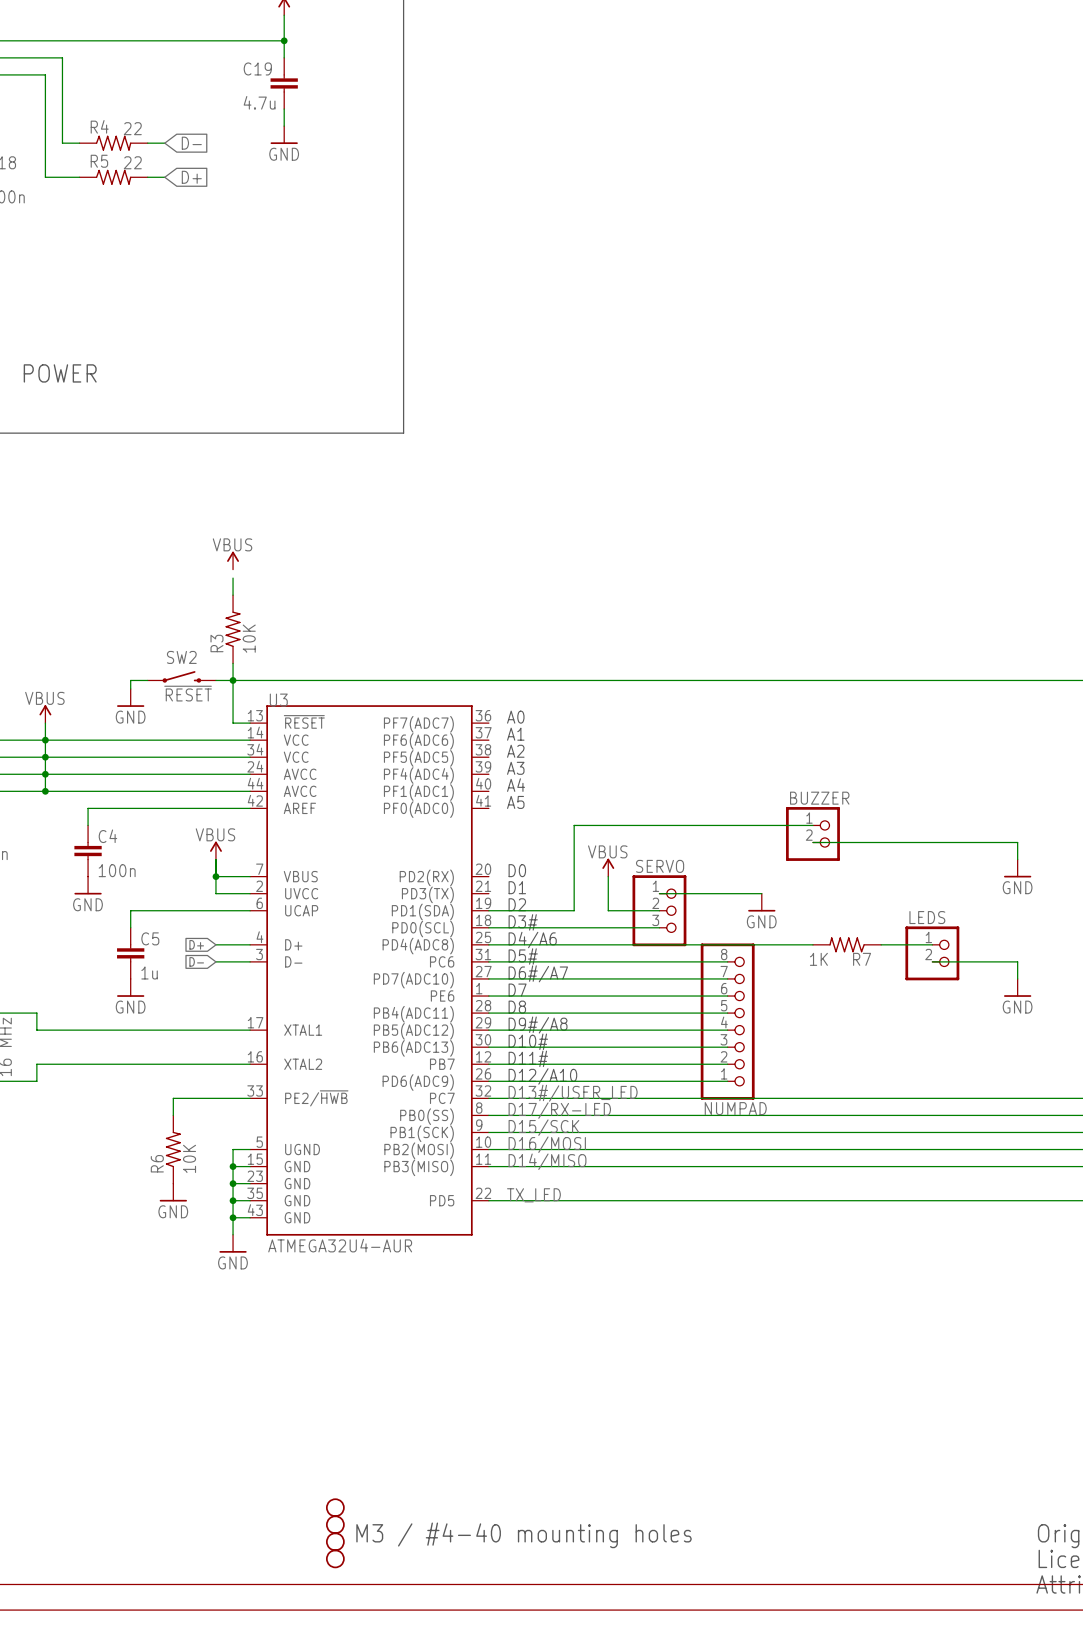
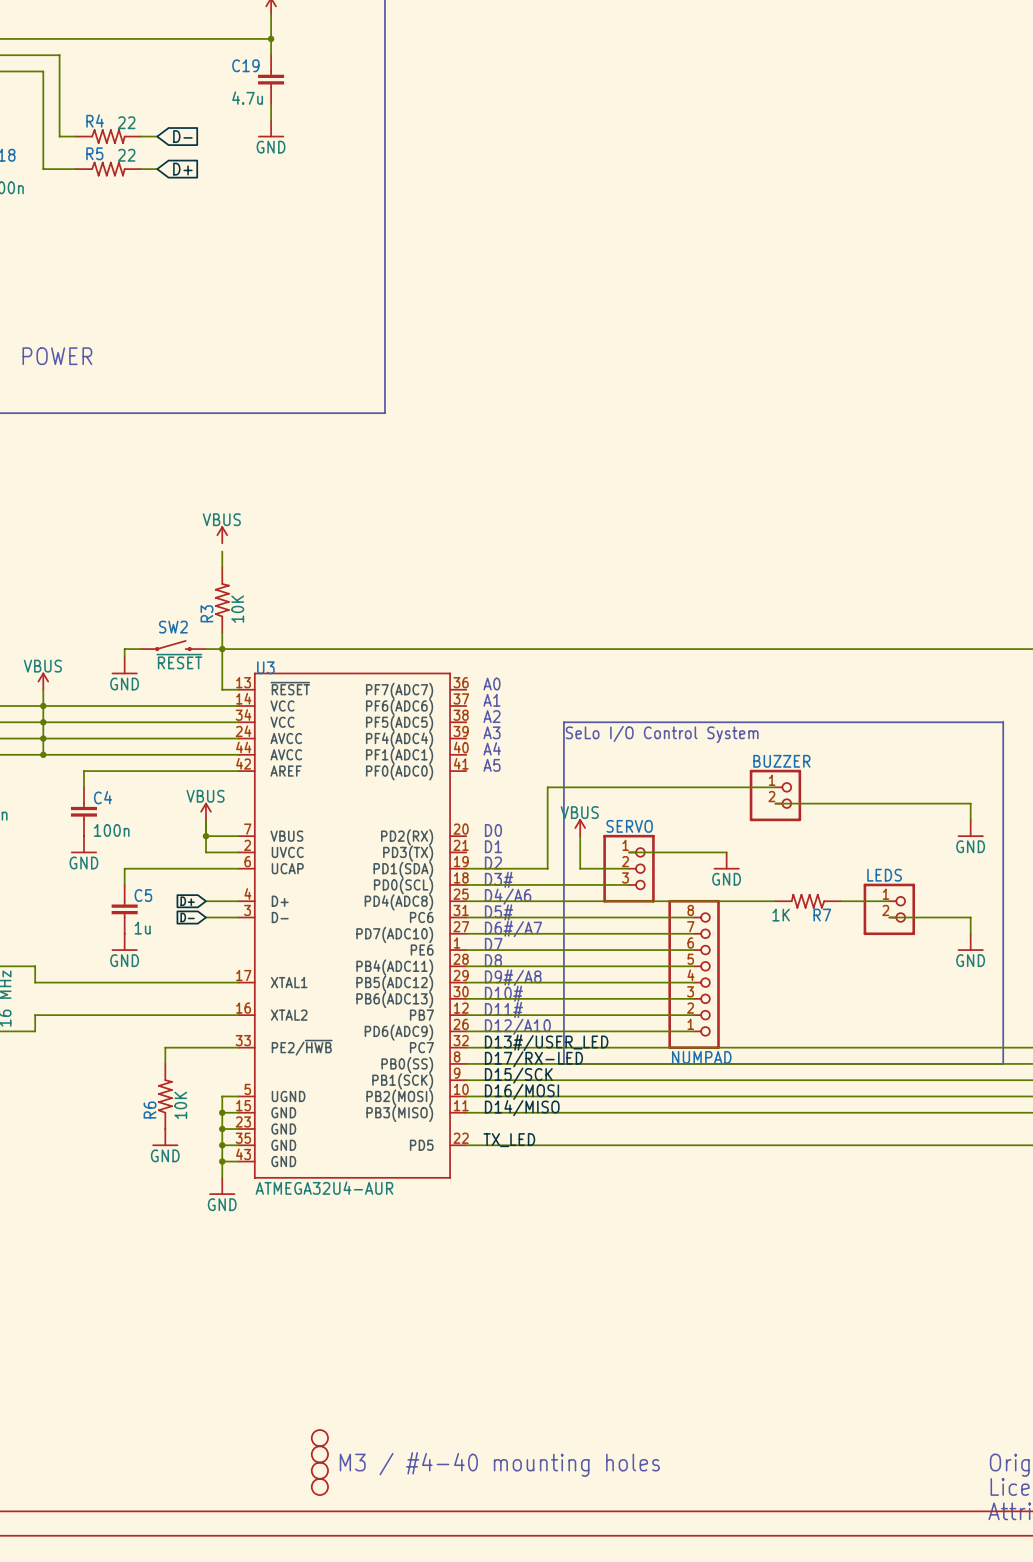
line: none -> (563, 722) (1003, 722) (1003, 1063) (563, 1063) (563, 722)
text: none -> SeLo I/O Control System (662, 734)

